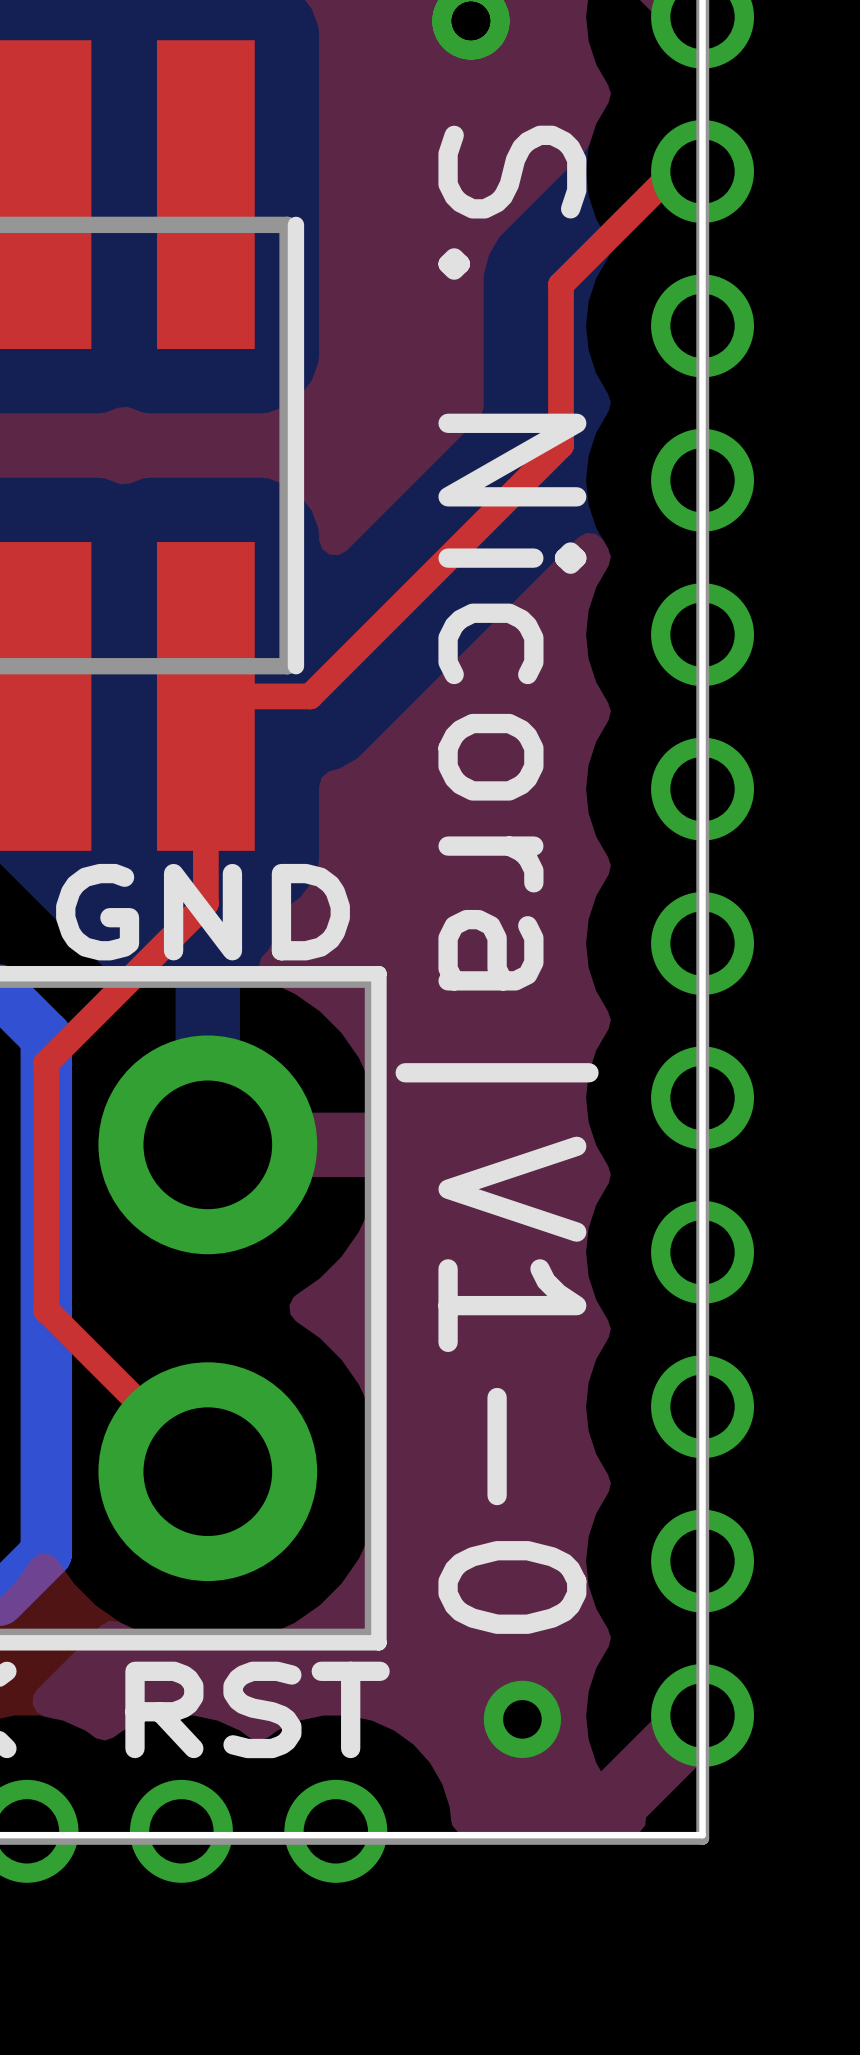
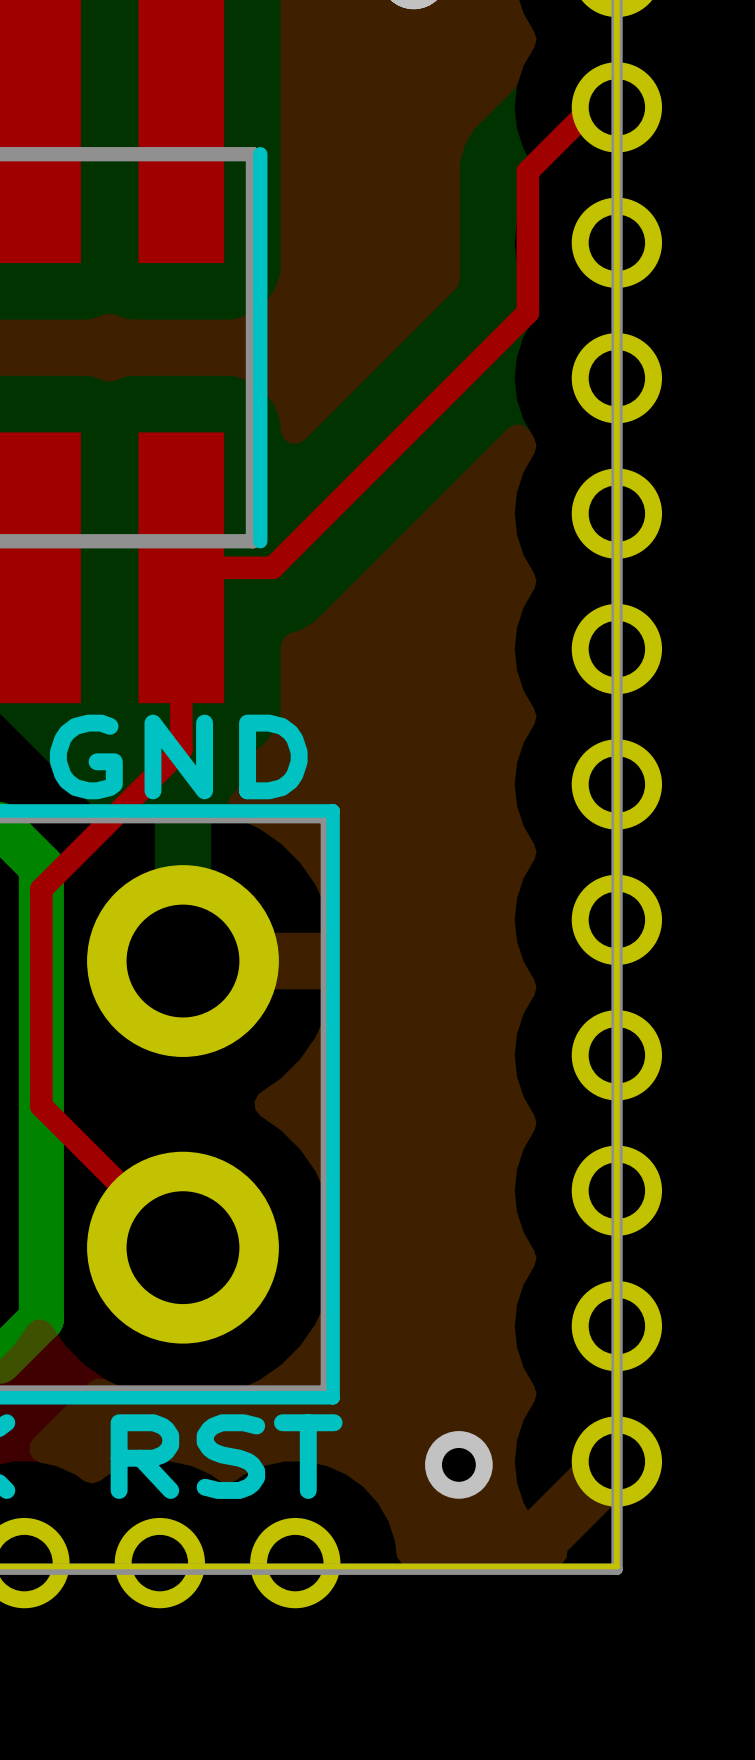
top track: (601, 244) (561, 284) (561, 445) -> (527, 171) (527, 312) (492, 347)
text: S. Nicora|V1-0 (497, 879) -> none

